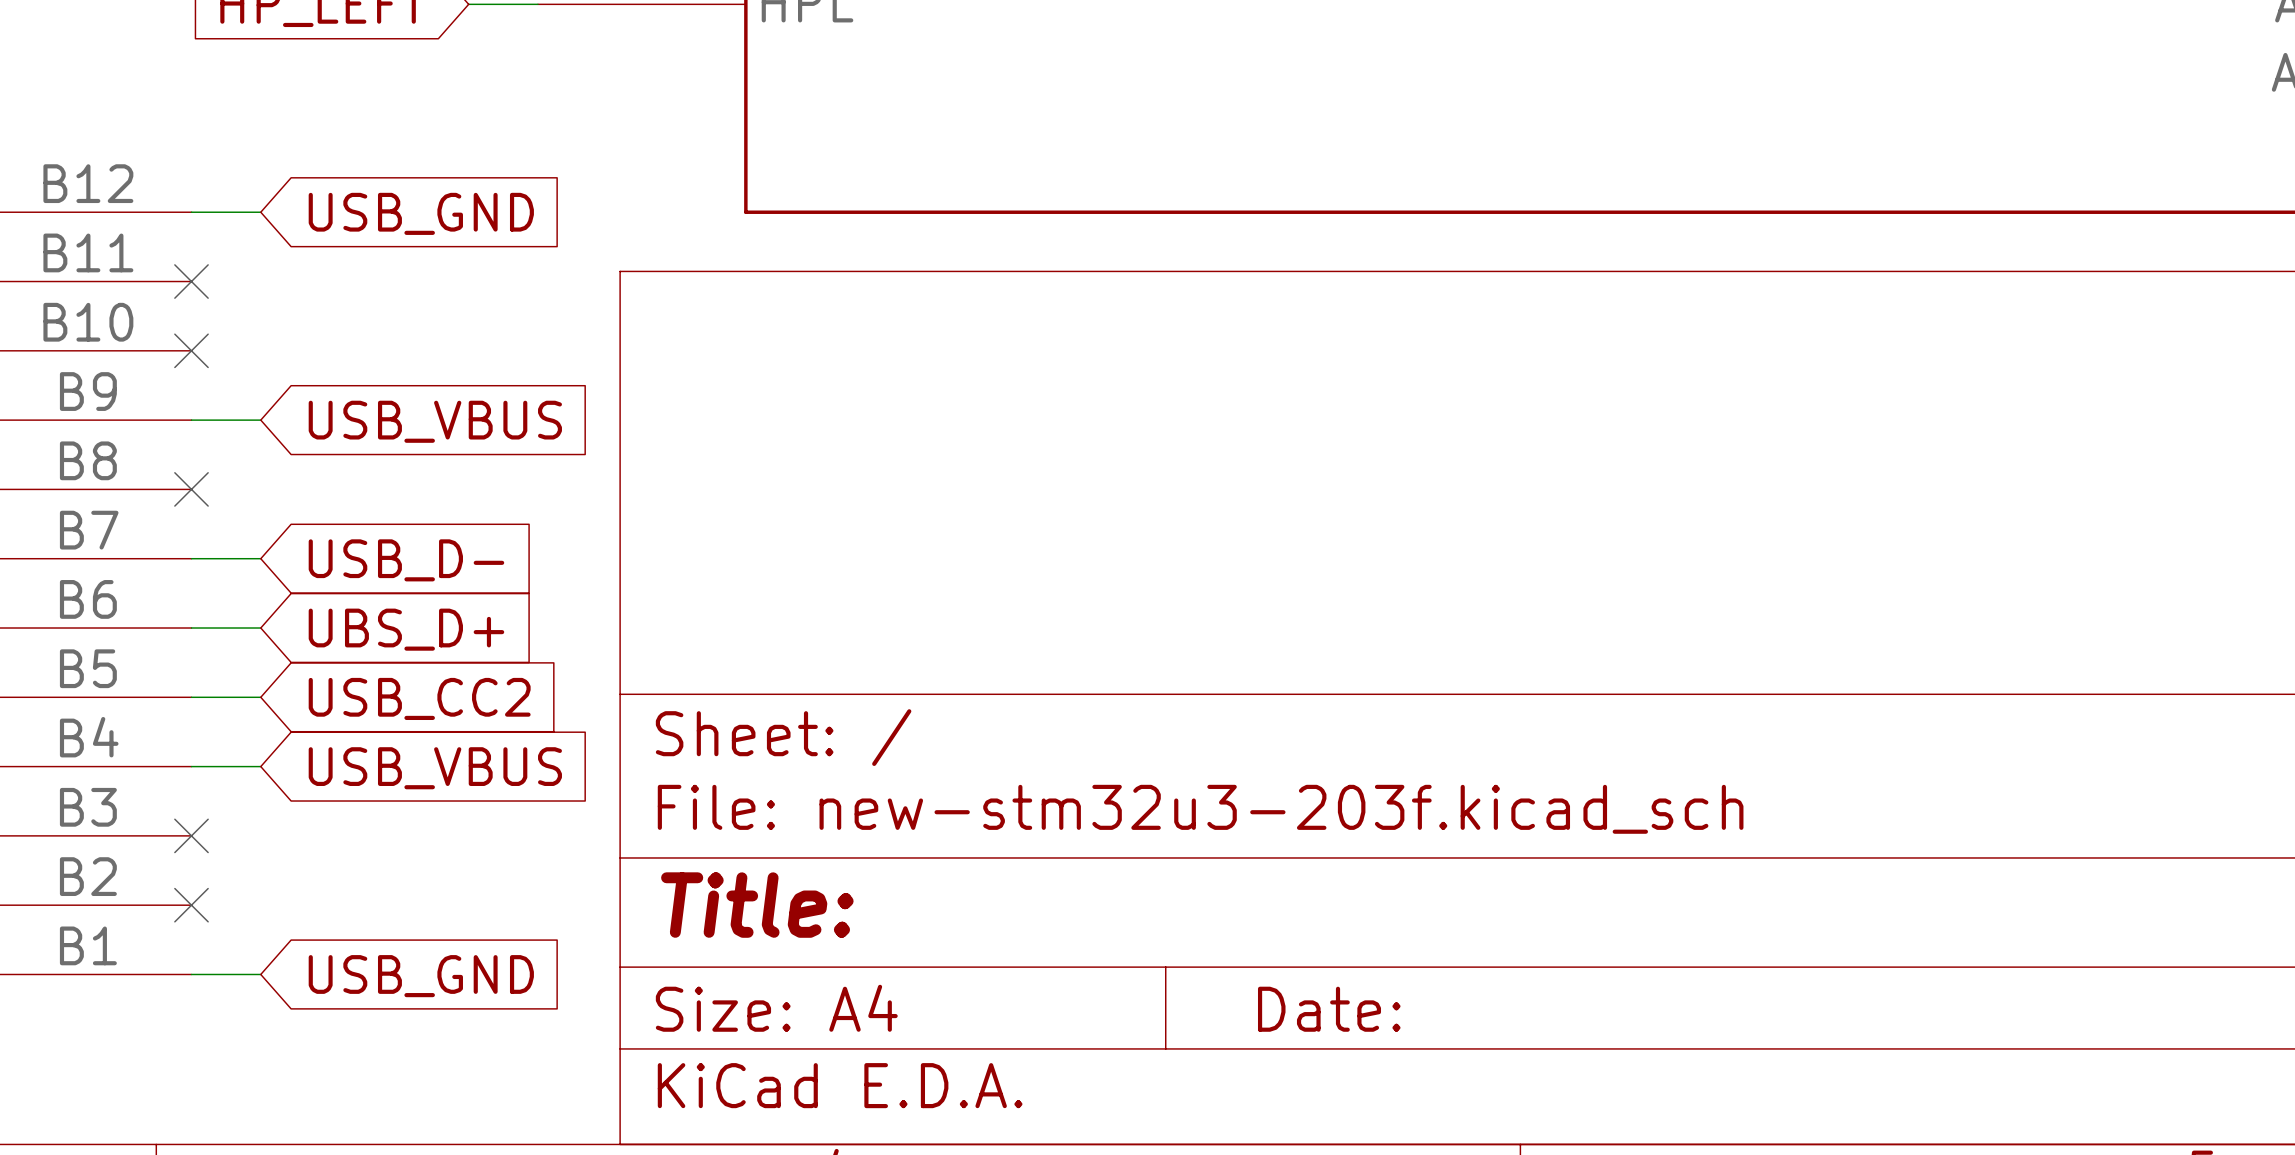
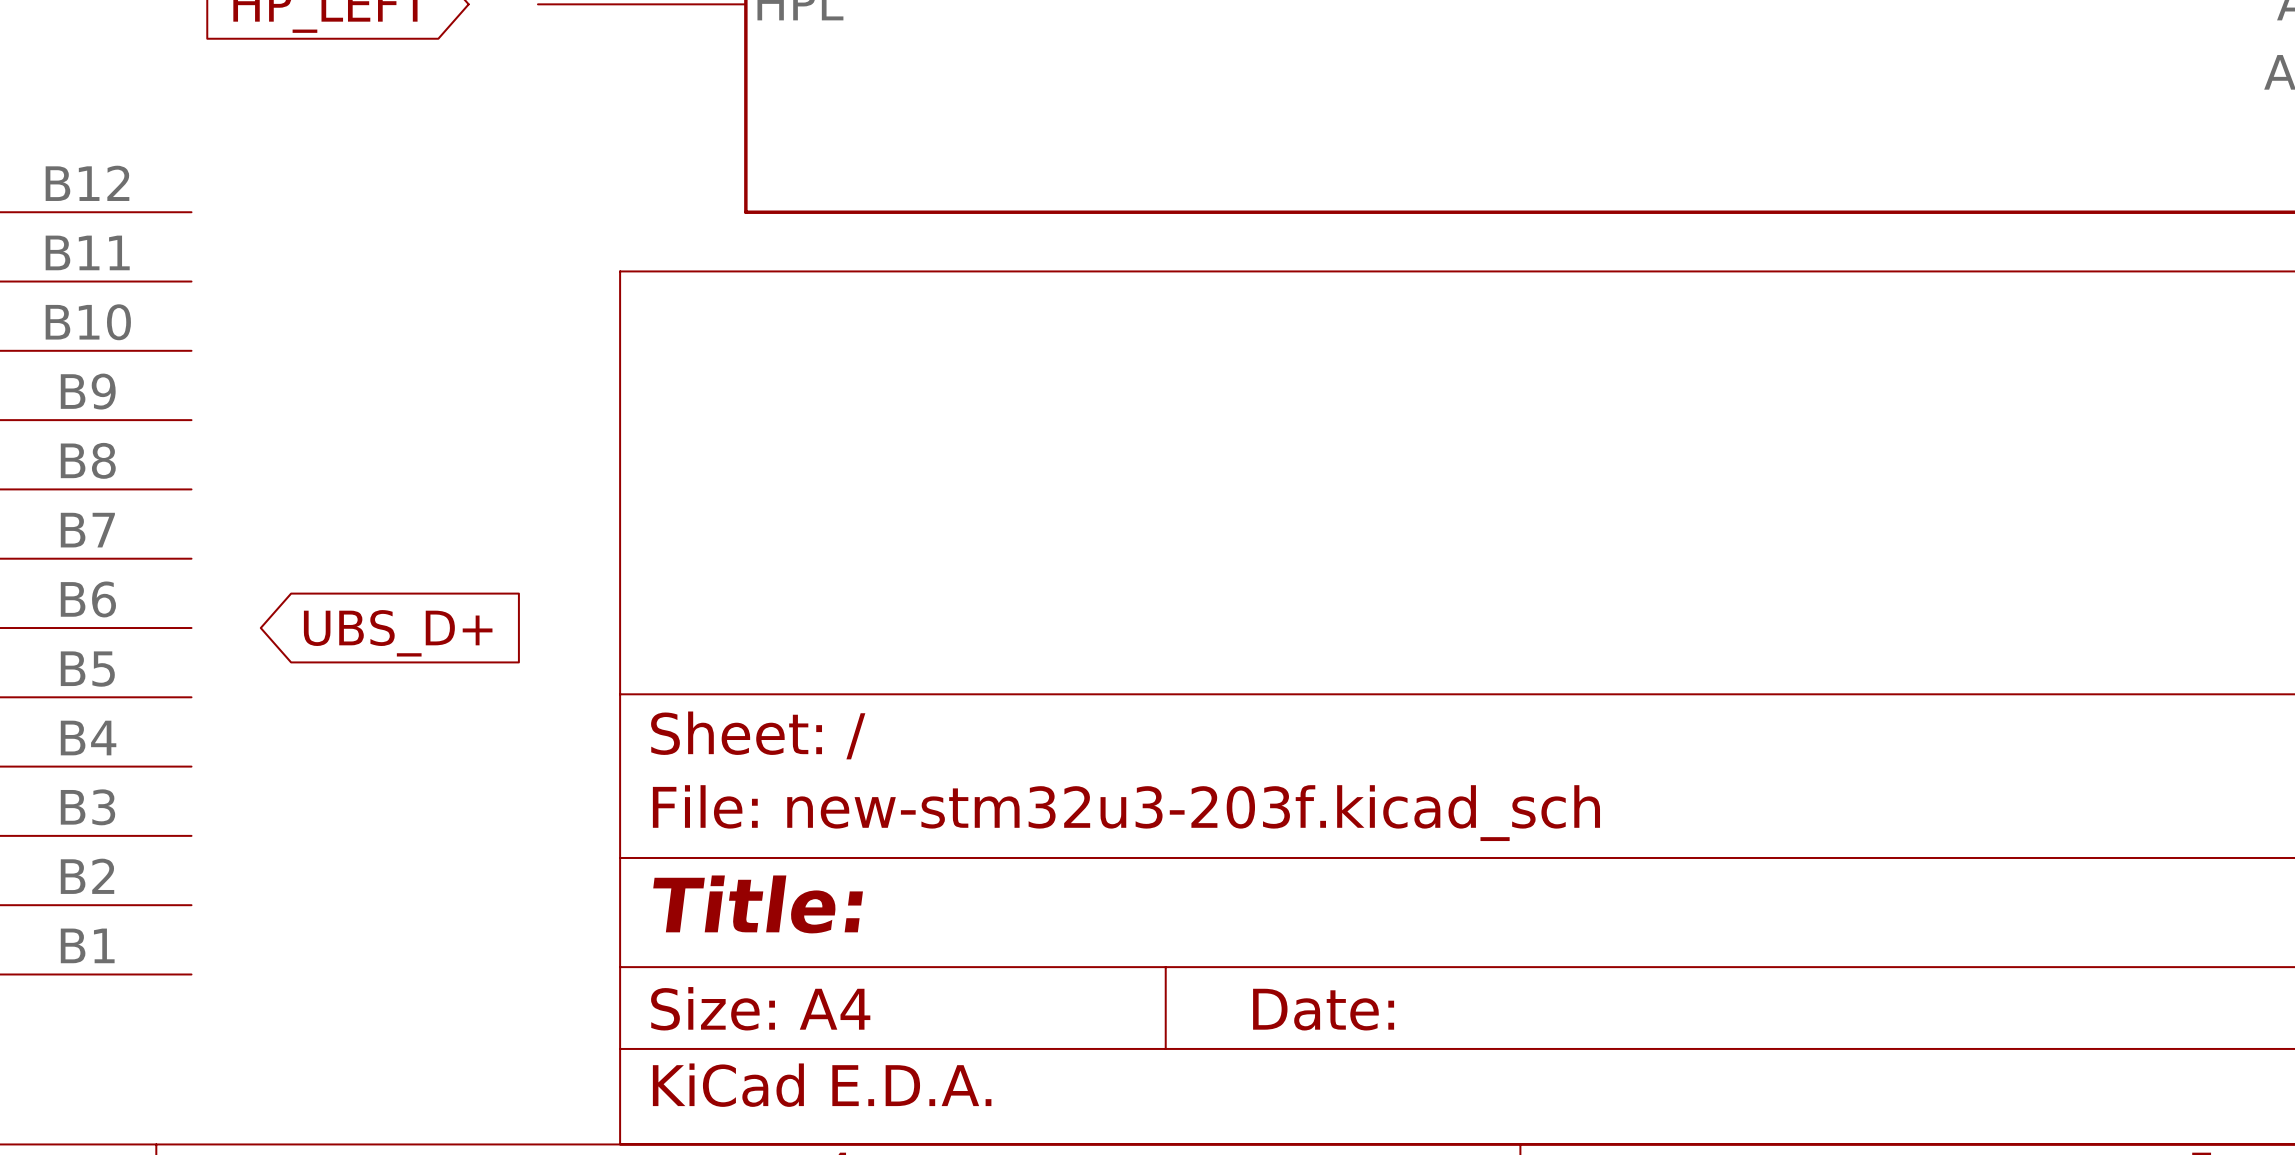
wire: (468, 4) (537, 4) -> none
wire: (191, 212) (260, 212) -> none
global label: USB_GND (421, 213) -> none
no-connect mark: (191, 281) -> none
no-connect mark: (191, 350) -> none
wire: (191, 420) (260, 420) -> none
global label: USB_VBUS (435, 421) -> none
no-connect mark: (191, 489) -> none
wire: (191, 558) (260, 558) -> none
global label: USB_D- (406, 560) -> none
wire: (191, 628) (260, 628) -> none
wire: (191, 697) (260, 697) -> none
global label: USB_CC2 (419, 698) -> none
wire: (191, 766) (260, 766) -> none
global label: USB_VBUS (435, 768) -> none
no-connect mark: (191, 835) -> none
no-connect mark: (191, 905) -> none
wire: (191, 974) (260, 974) -> none
global label: USB_GND (421, 976) -> none

